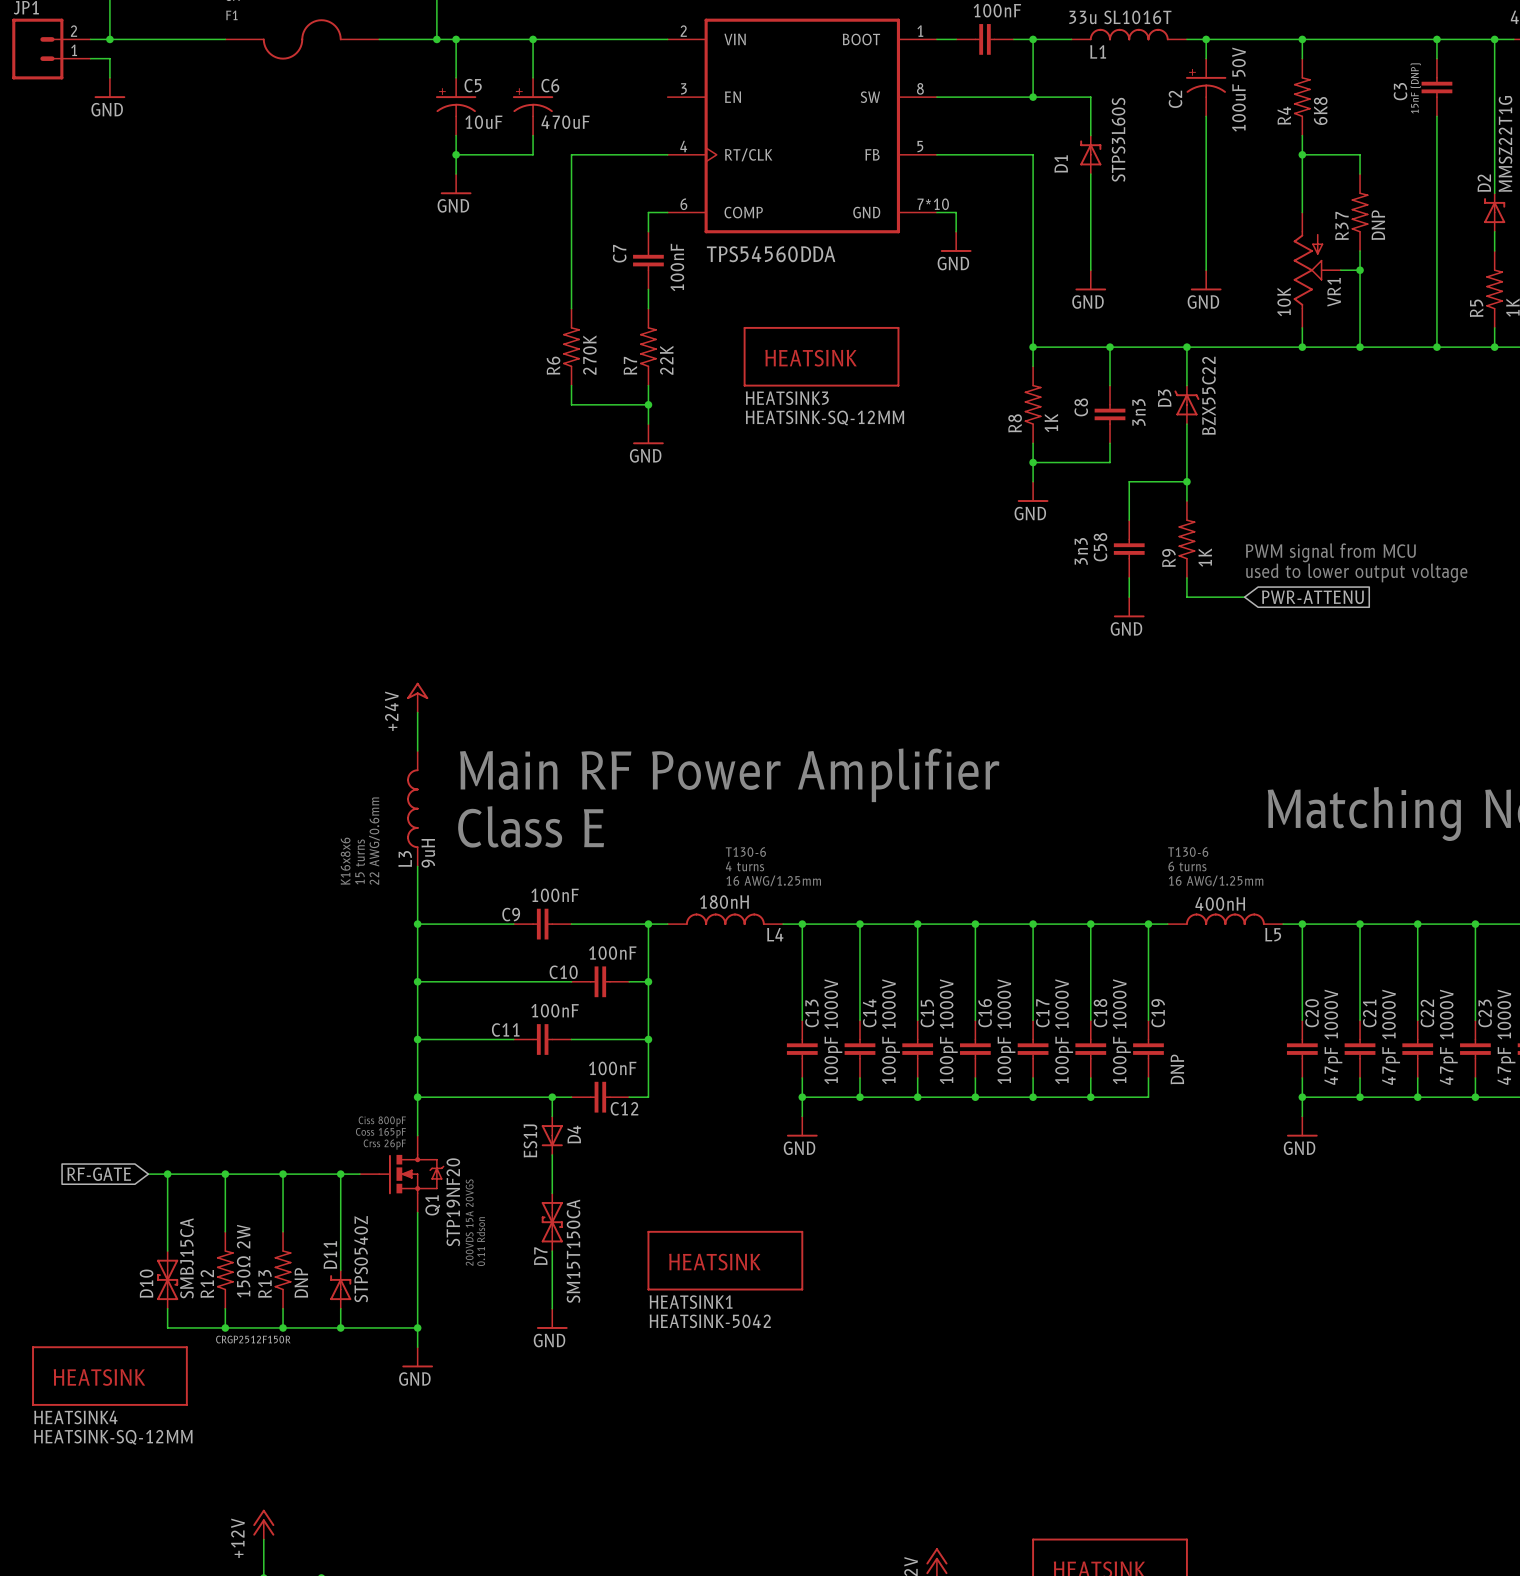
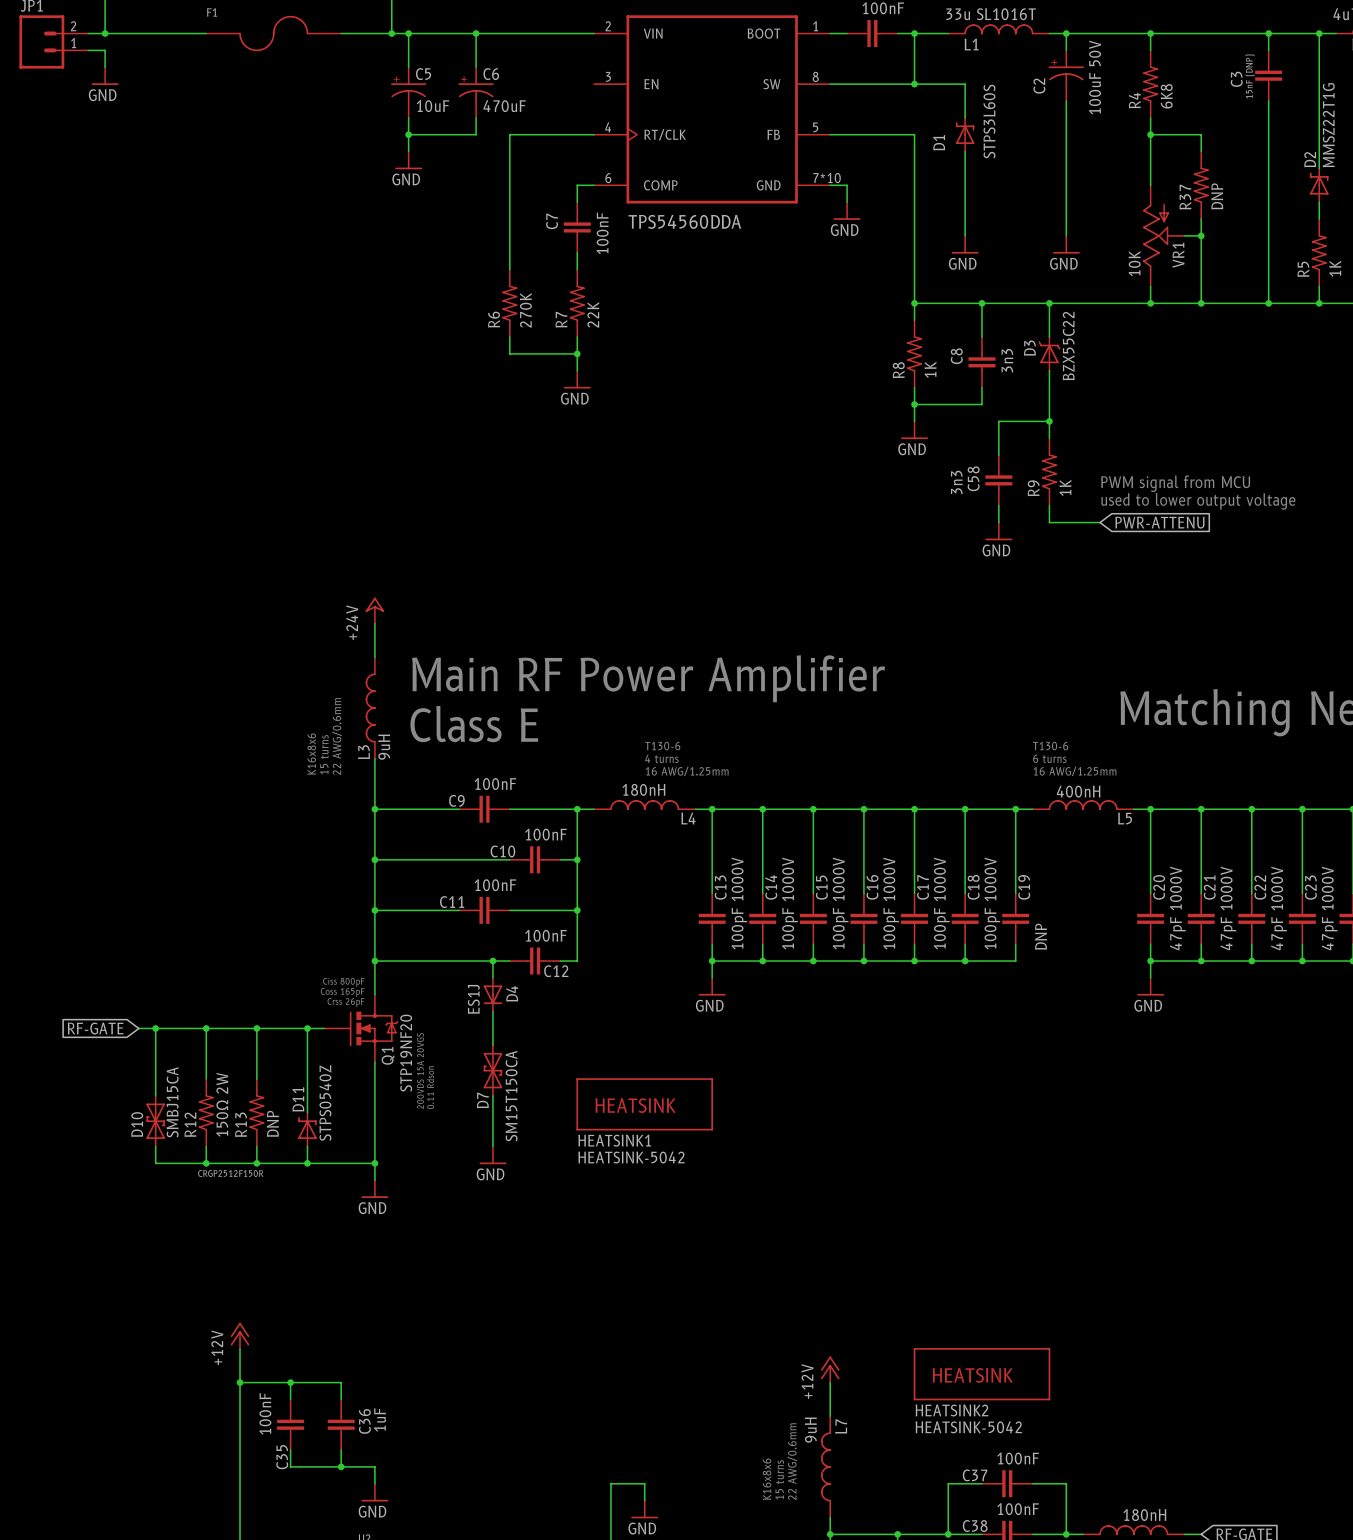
HEATSINK3: HEATSINK-SQ-12MM (821, 356) -> none
HEATSINK4: HEATSINK-SQ-12MM (109, 1376) -> none

